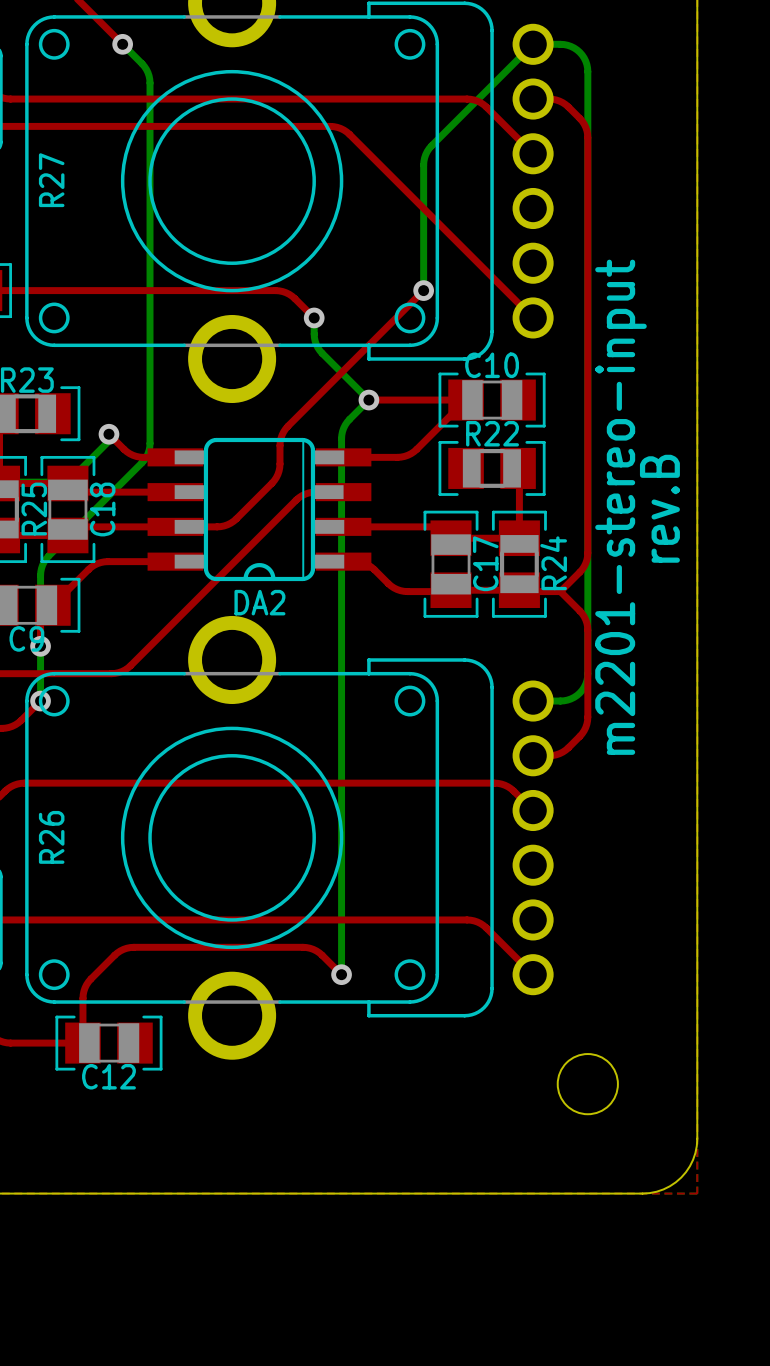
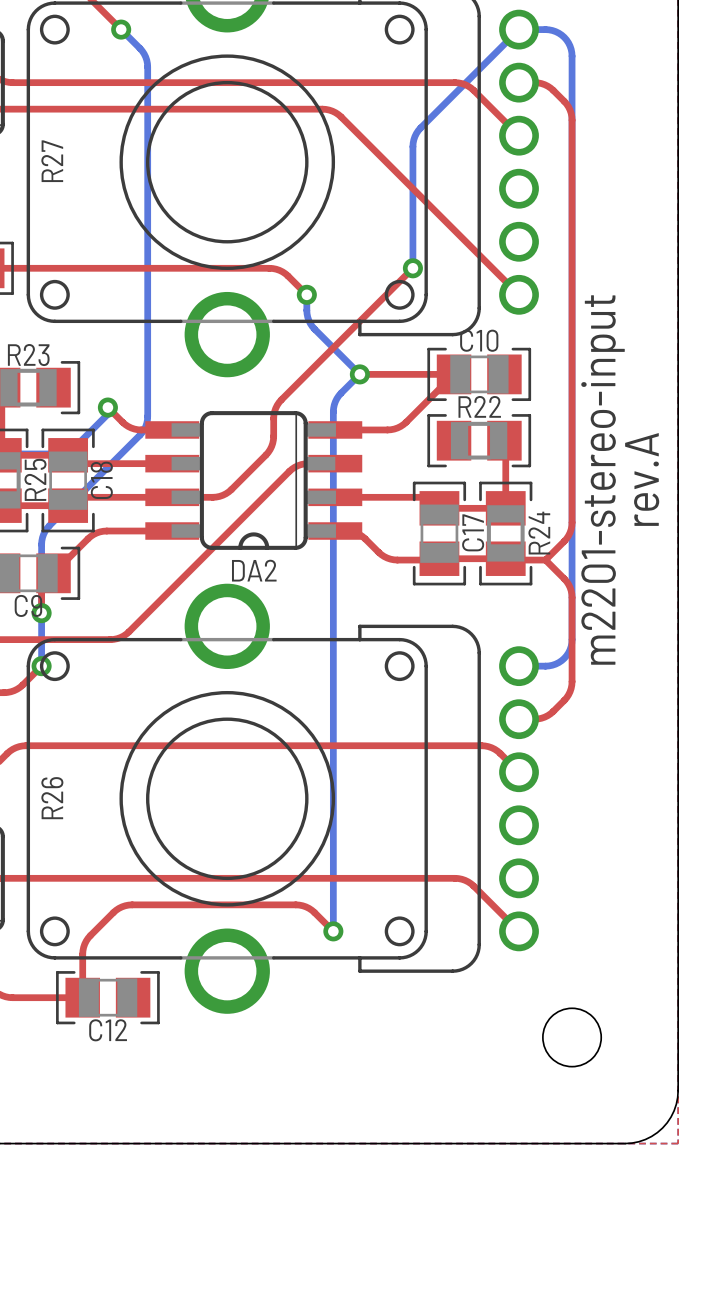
part value: rev.B (659, 508) -> rev.A (642, 479)

